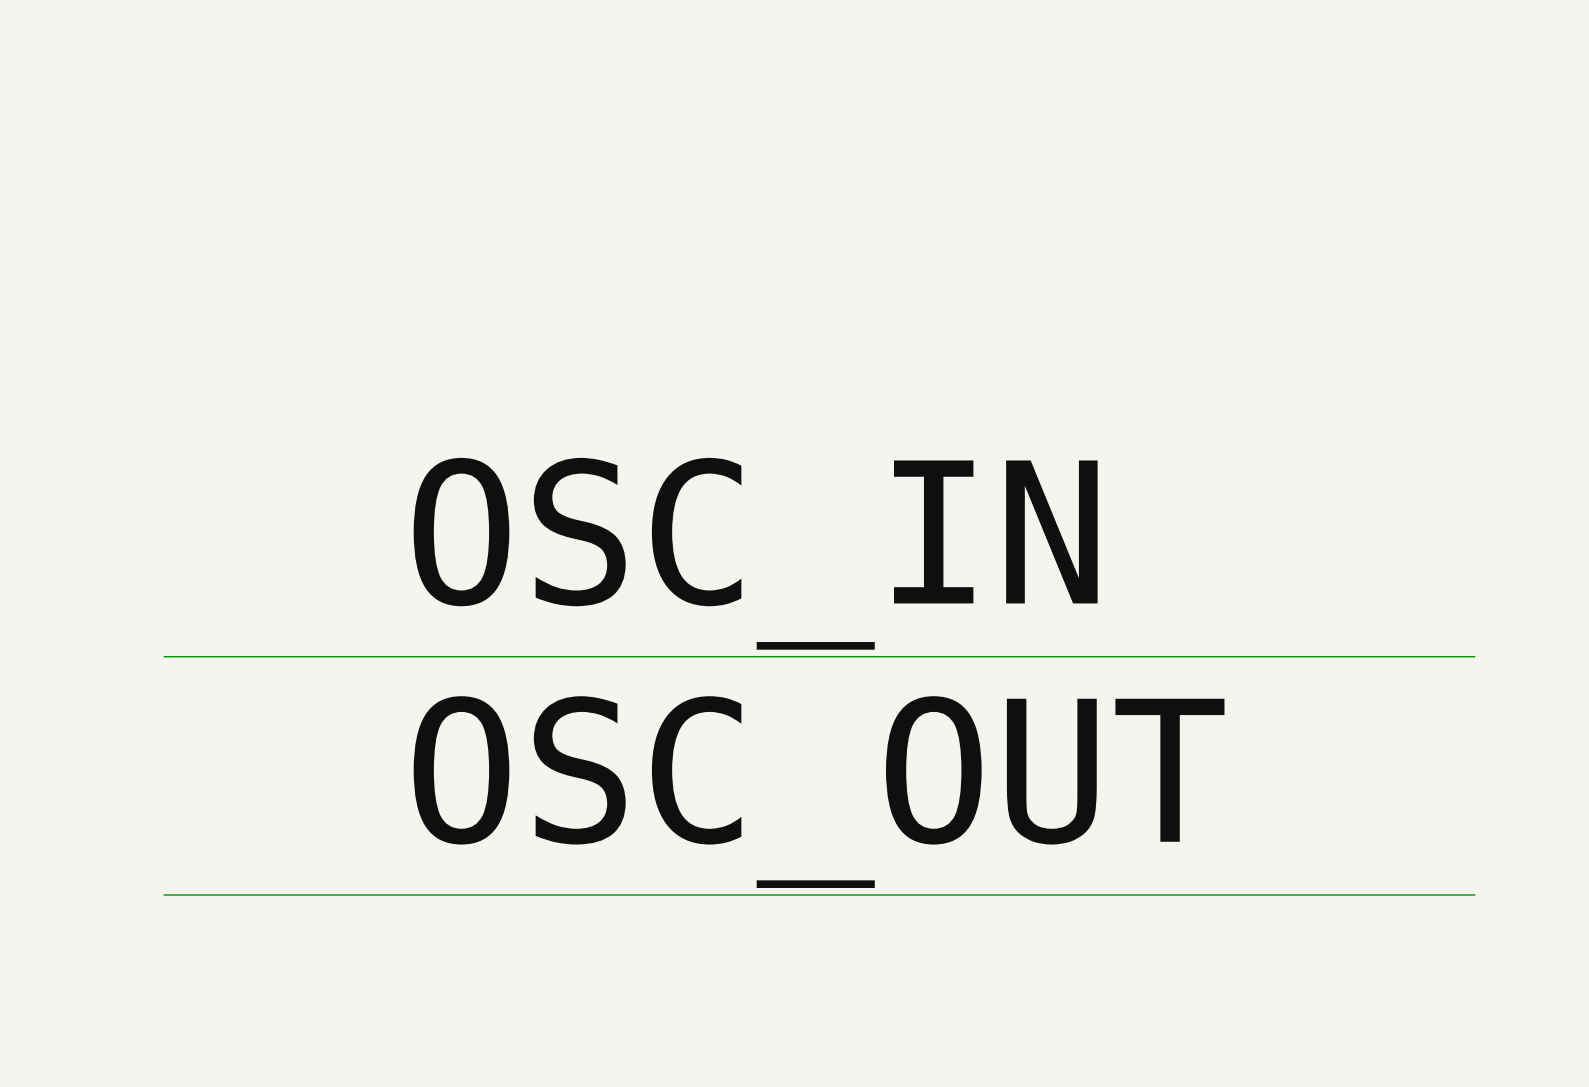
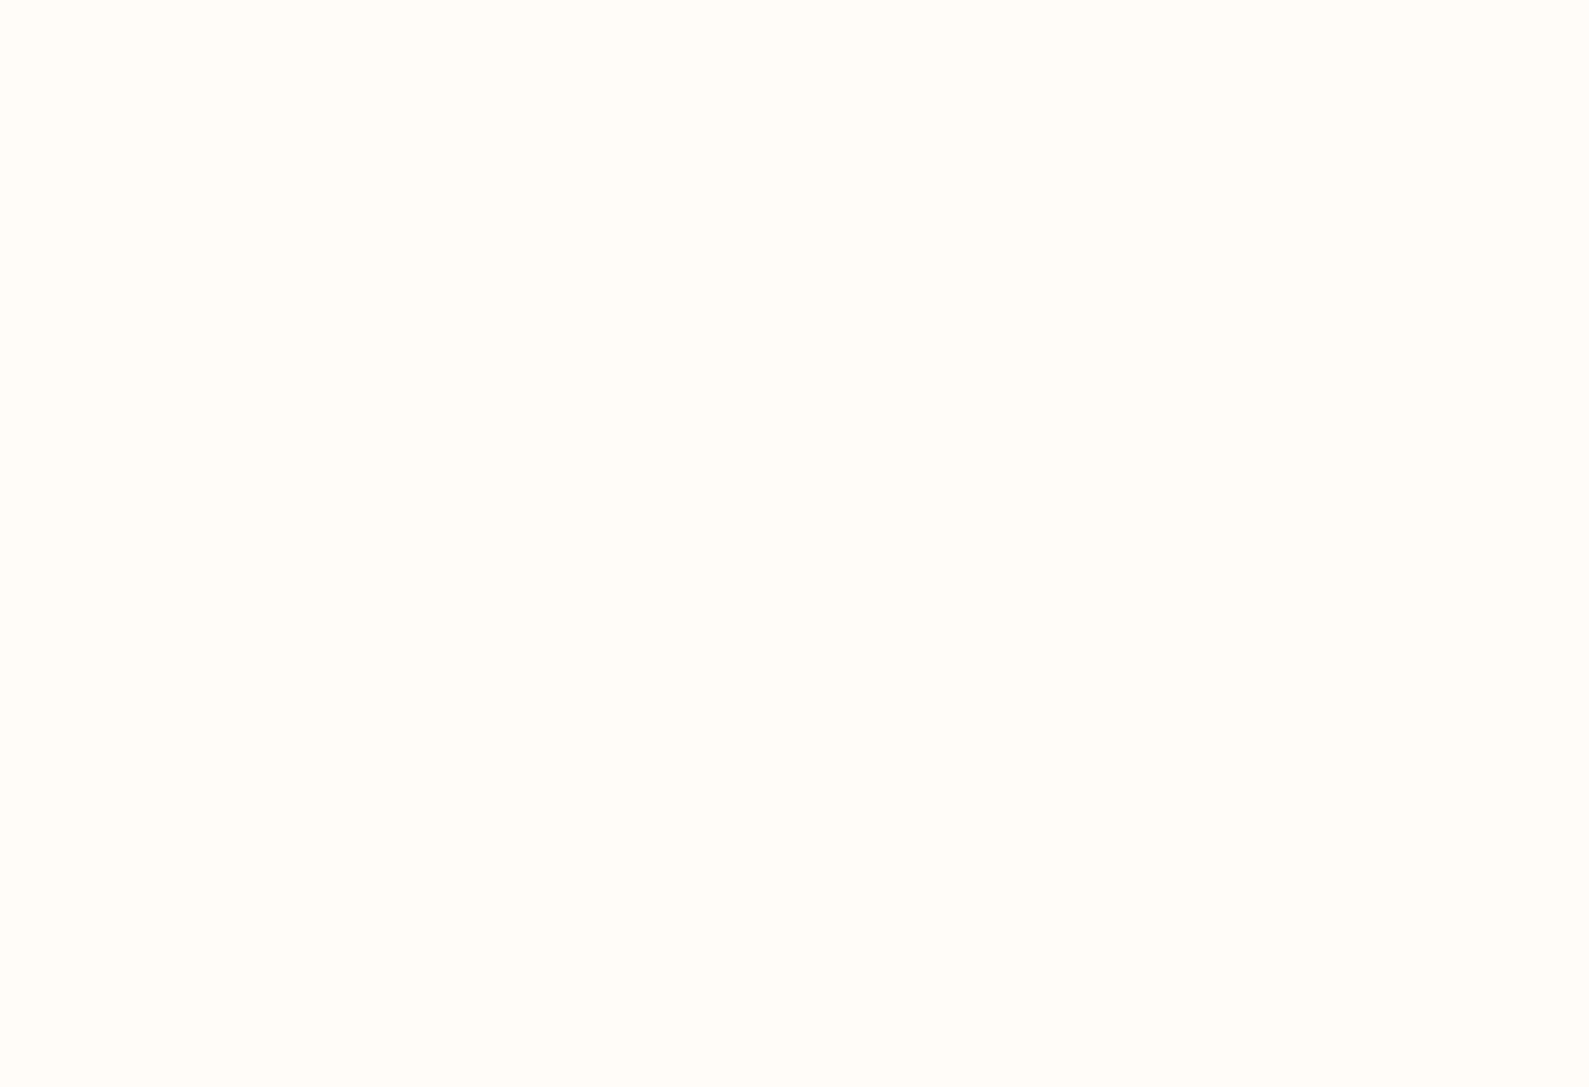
label: OSC_IN (755, 553) -> none
wire: (164, 656) (1474, 656) -> none
label: OSC_OUT (819, 792) -> none
wire: (164, 895) (1474, 895) -> none

